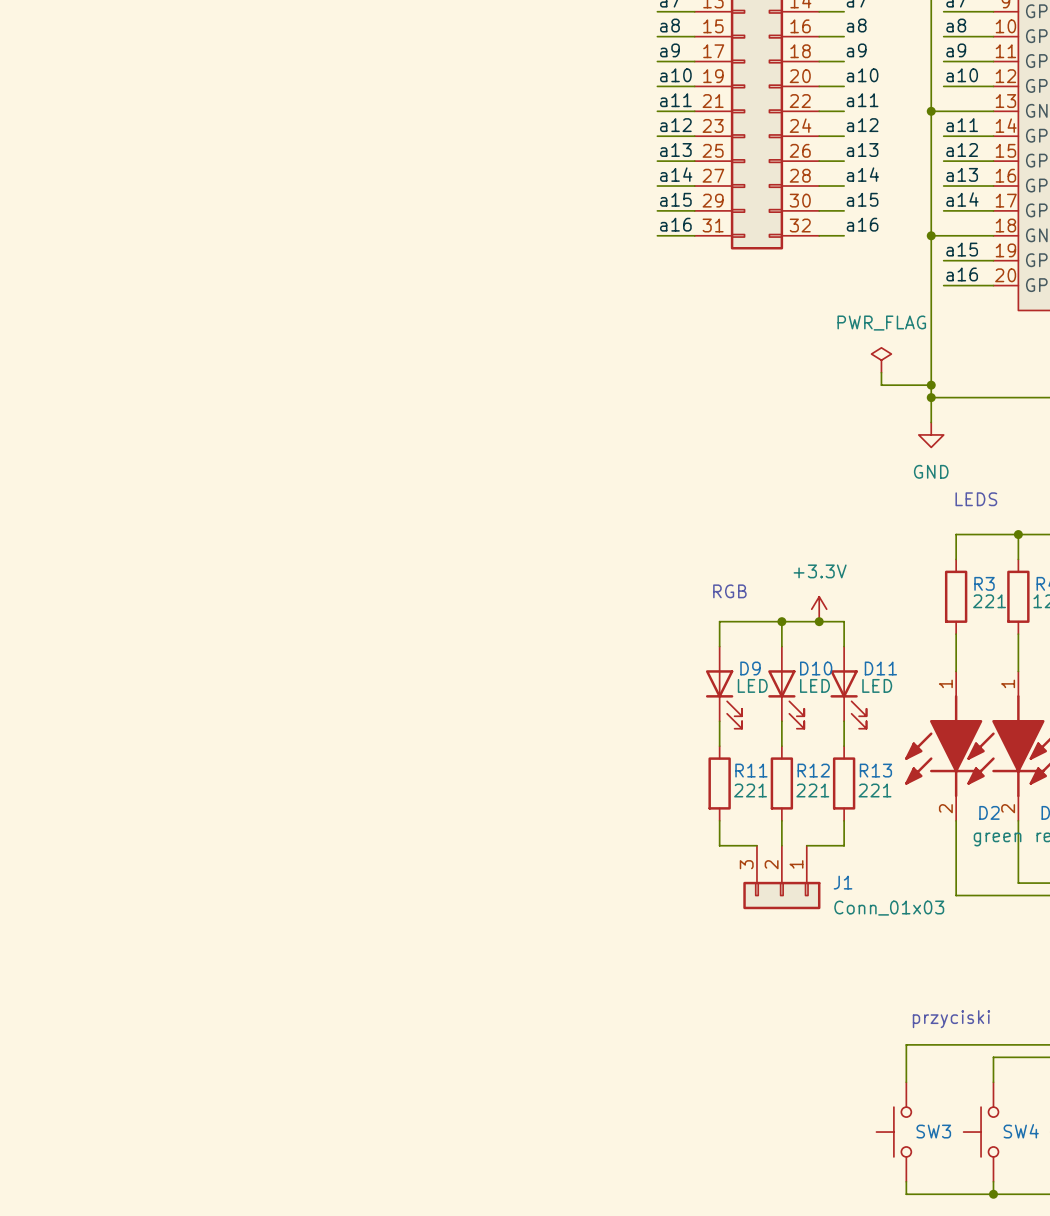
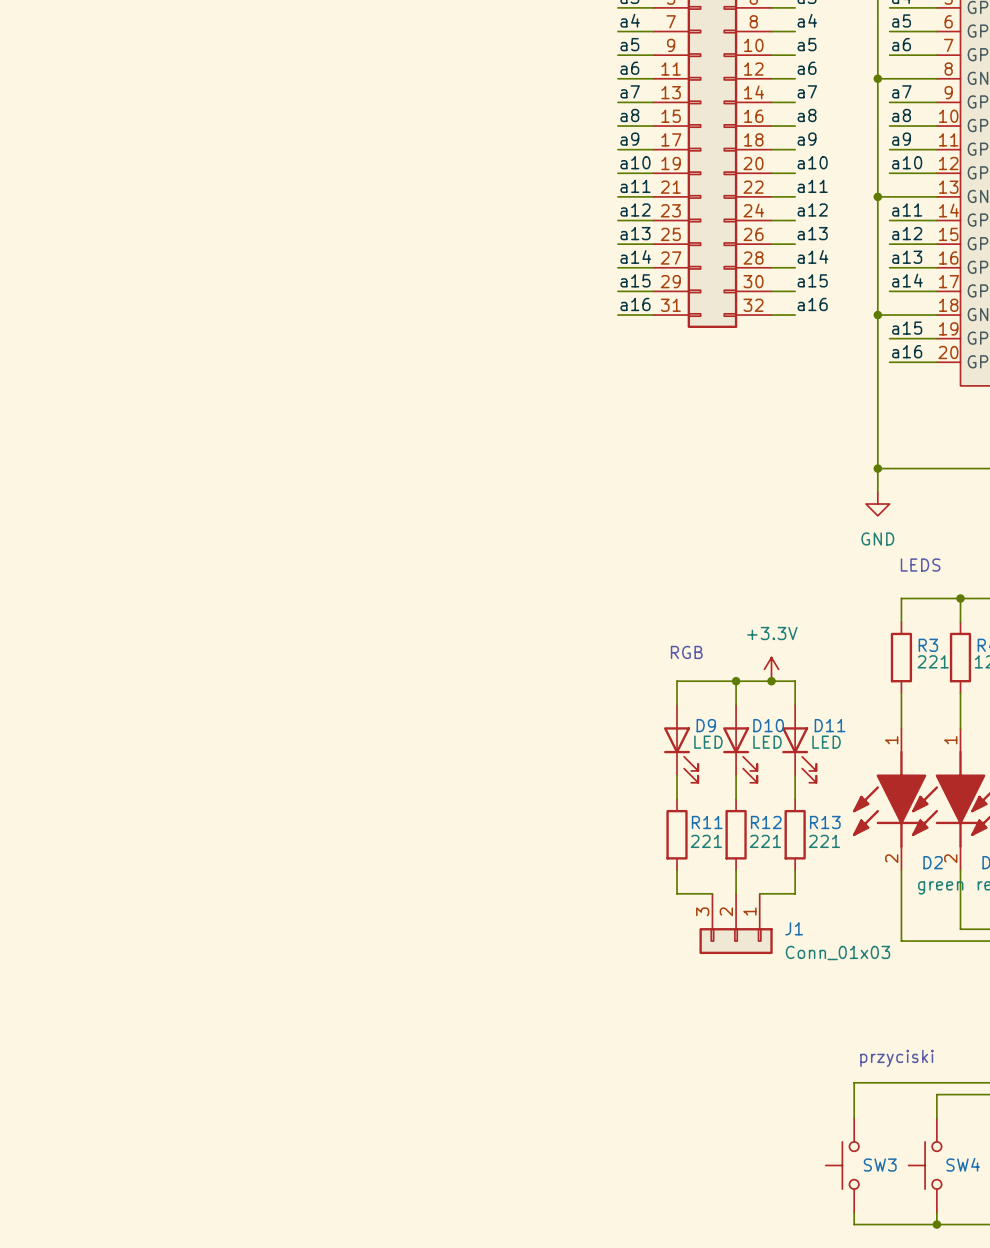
power symbol: PWR_FLAG (881, 360) -> none
wire: (881, 372) (881, 385) (931, 385) -> none
junction: (931, 385) -> none

